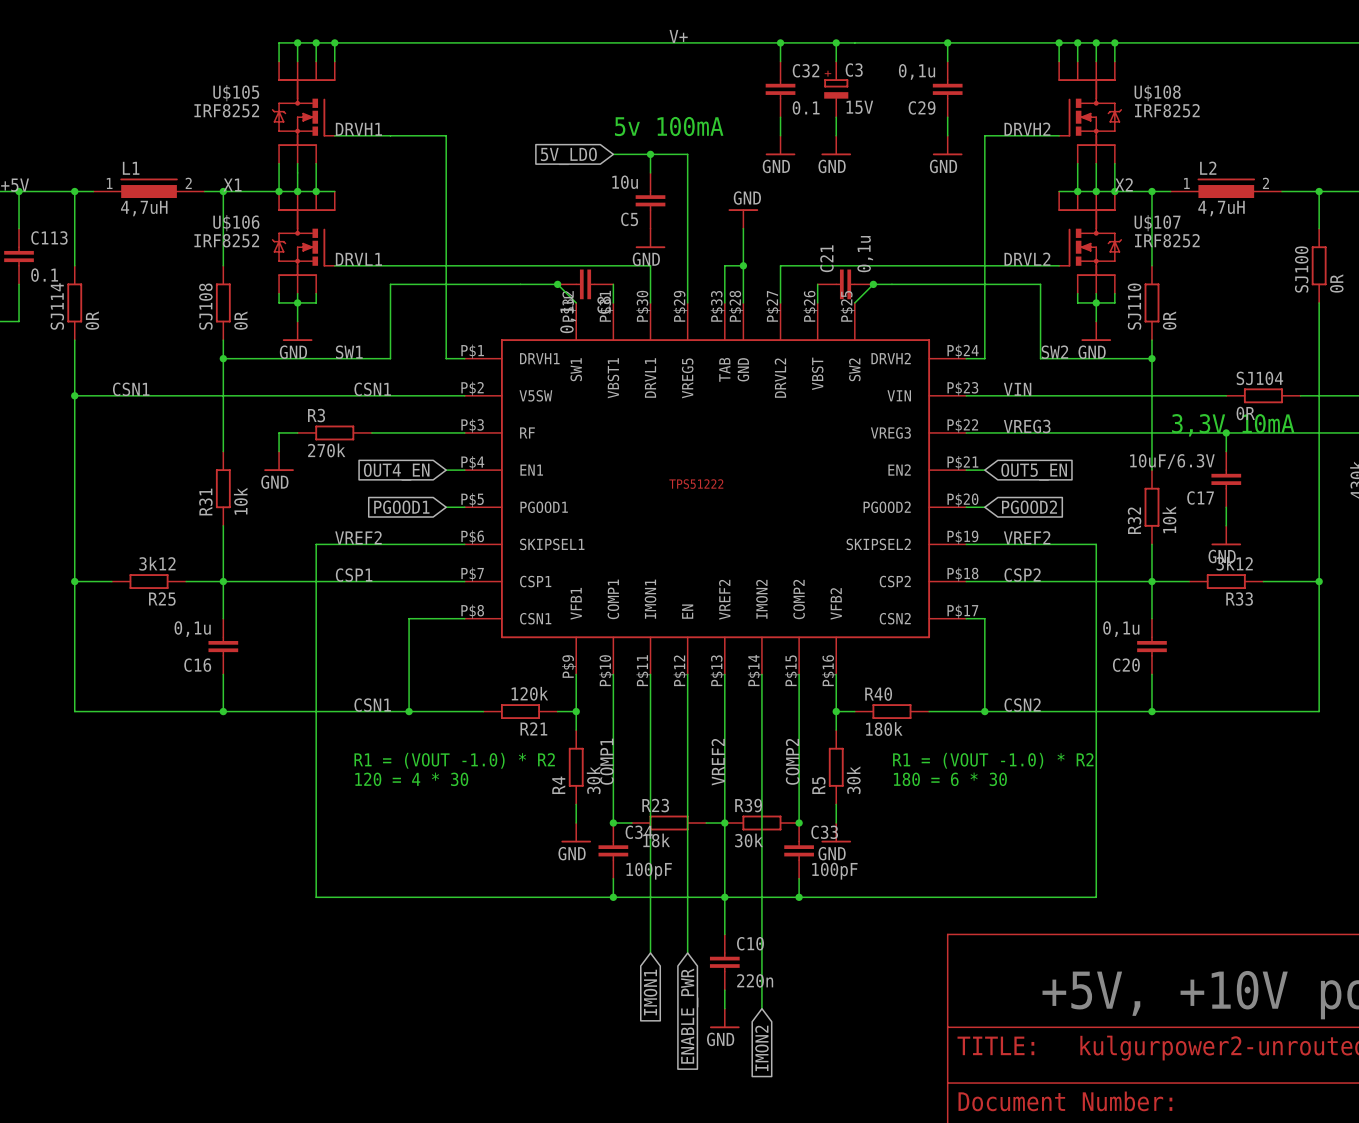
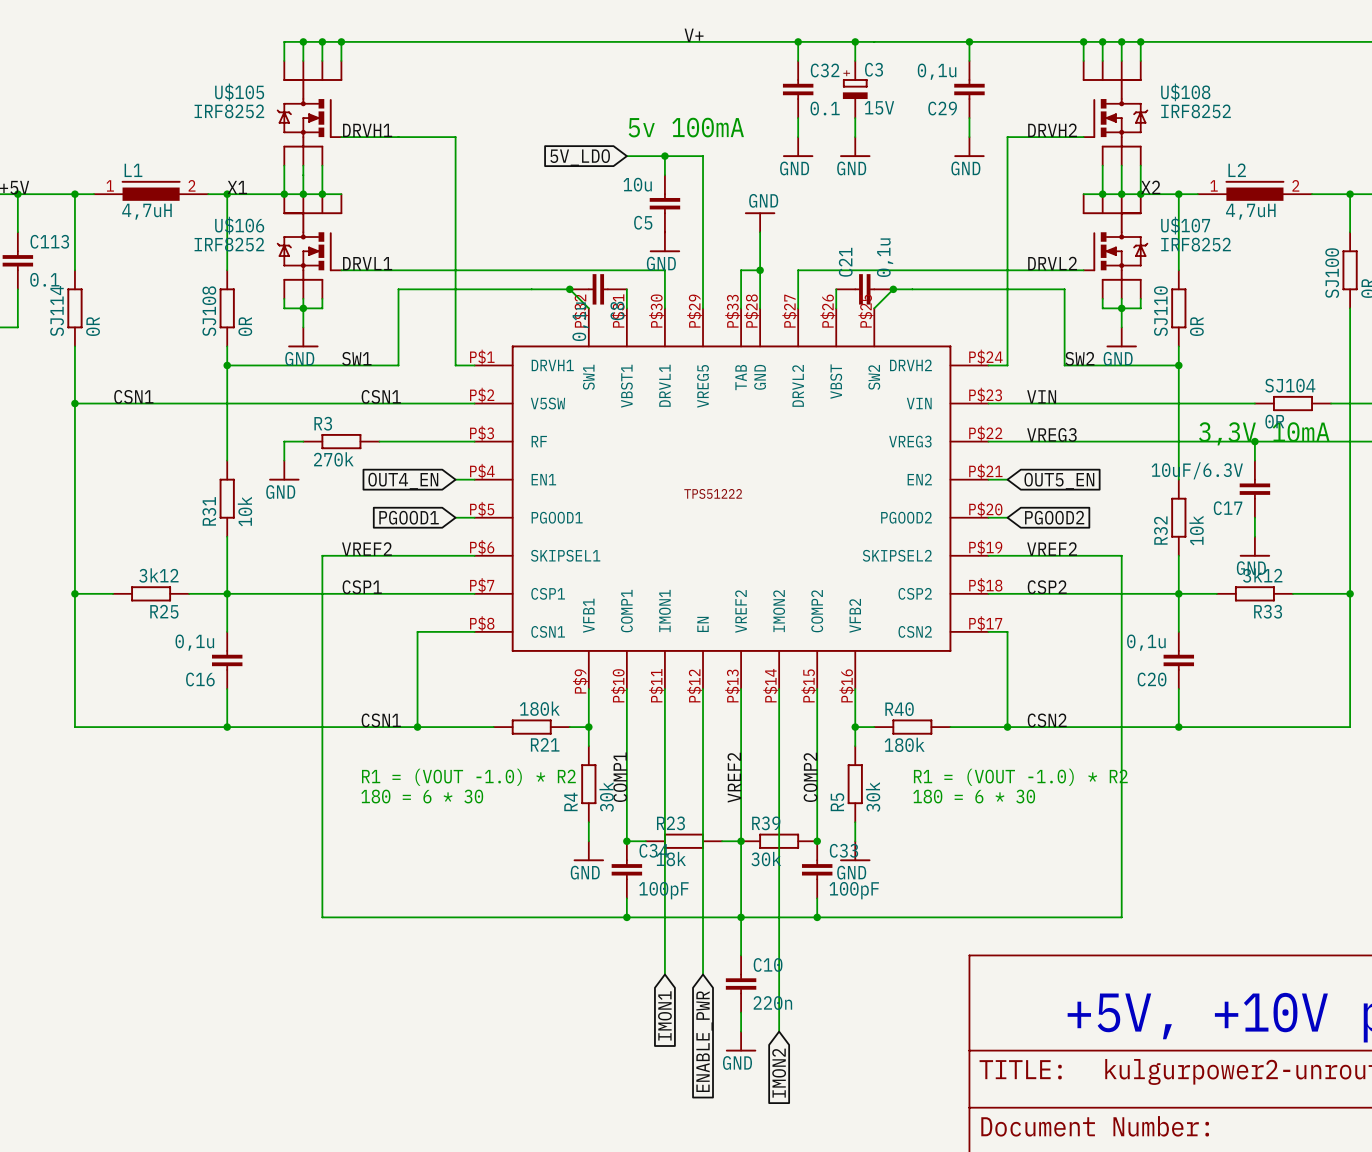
R21 value: 120k (529, 693) -> 180k (539, 708)
text: 120 = 4 * 30 (411, 779) -> 180 = 6 * 30 (422, 796)

